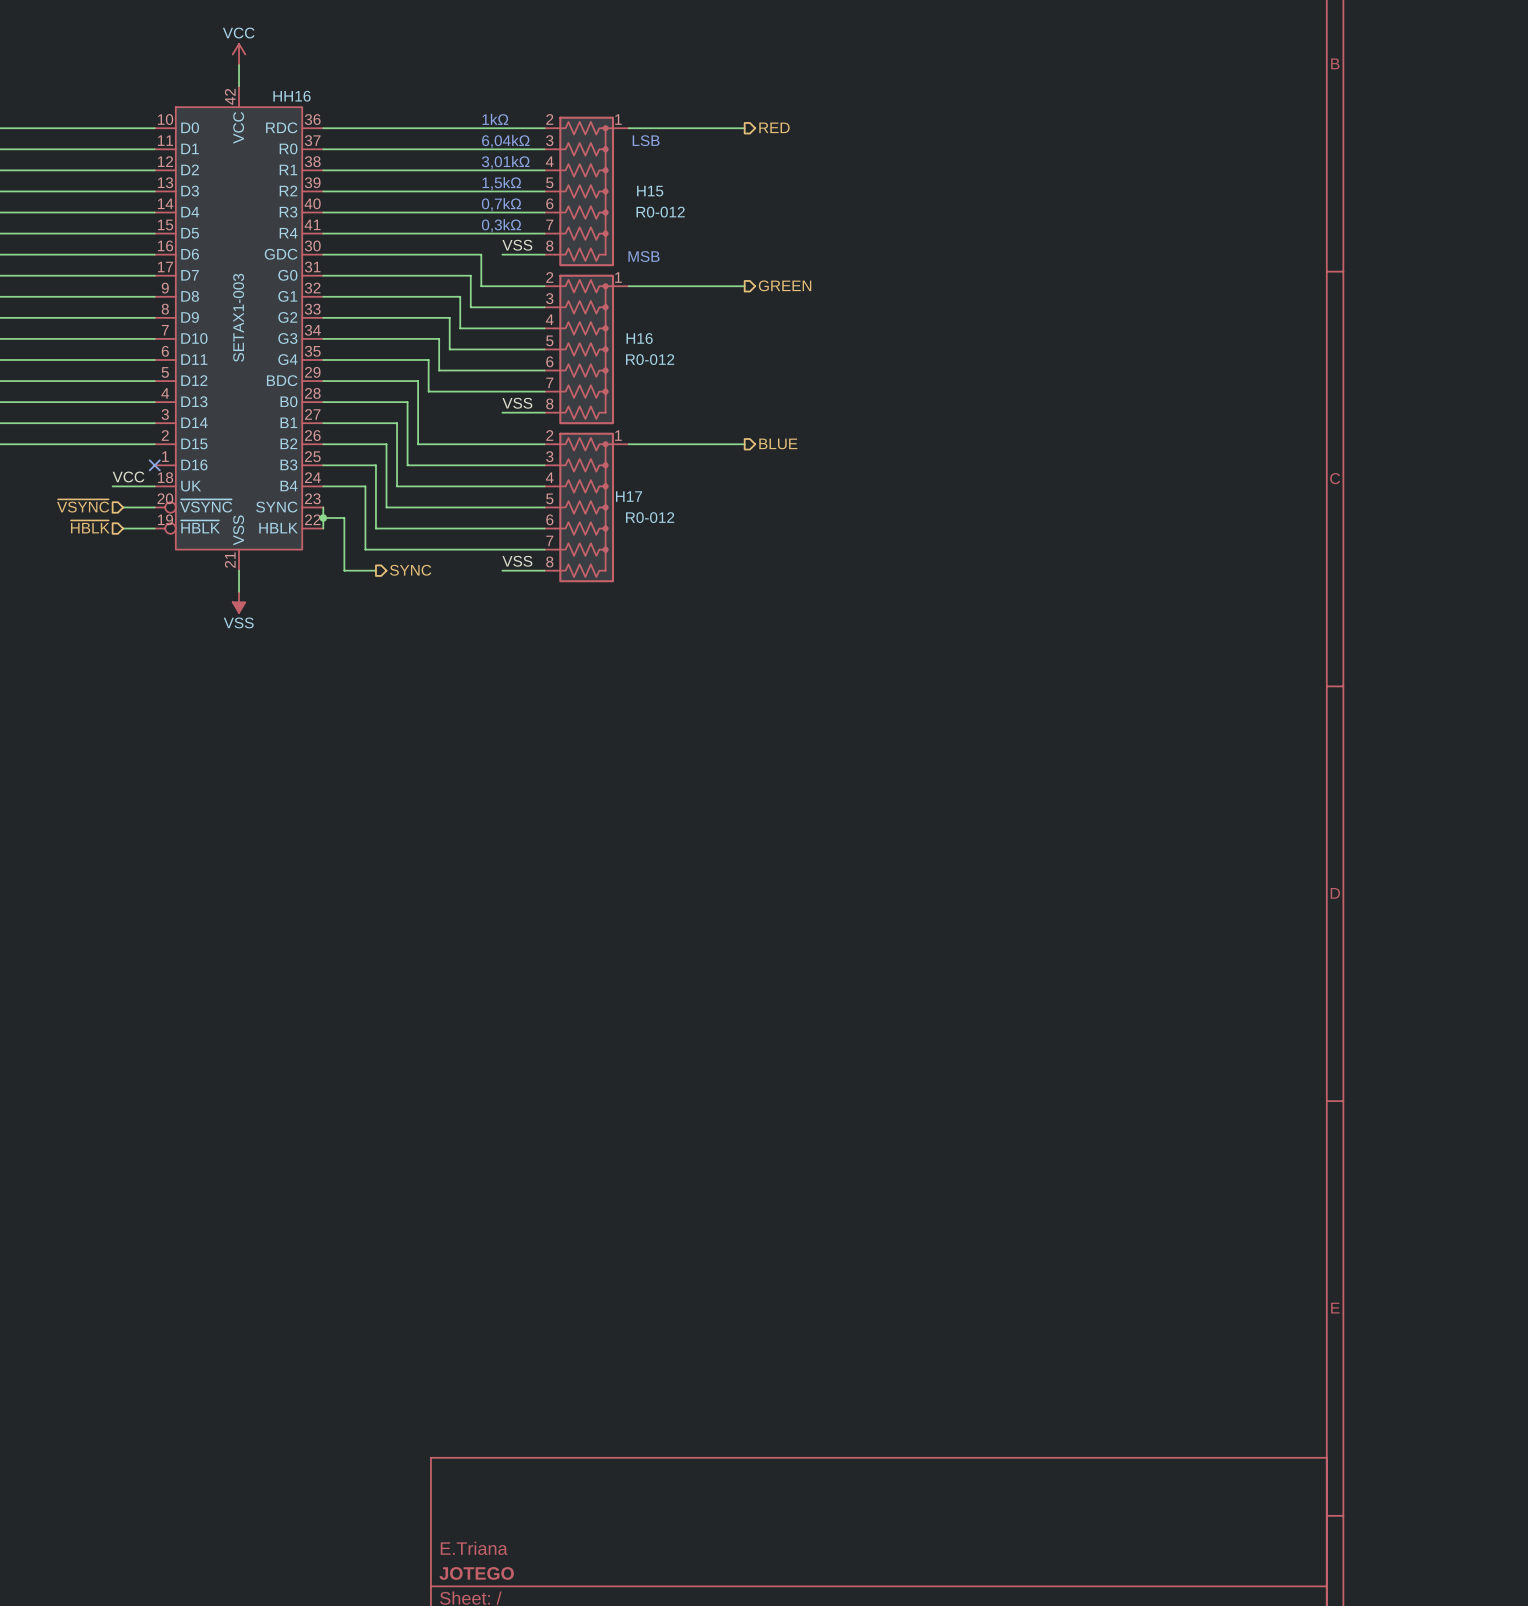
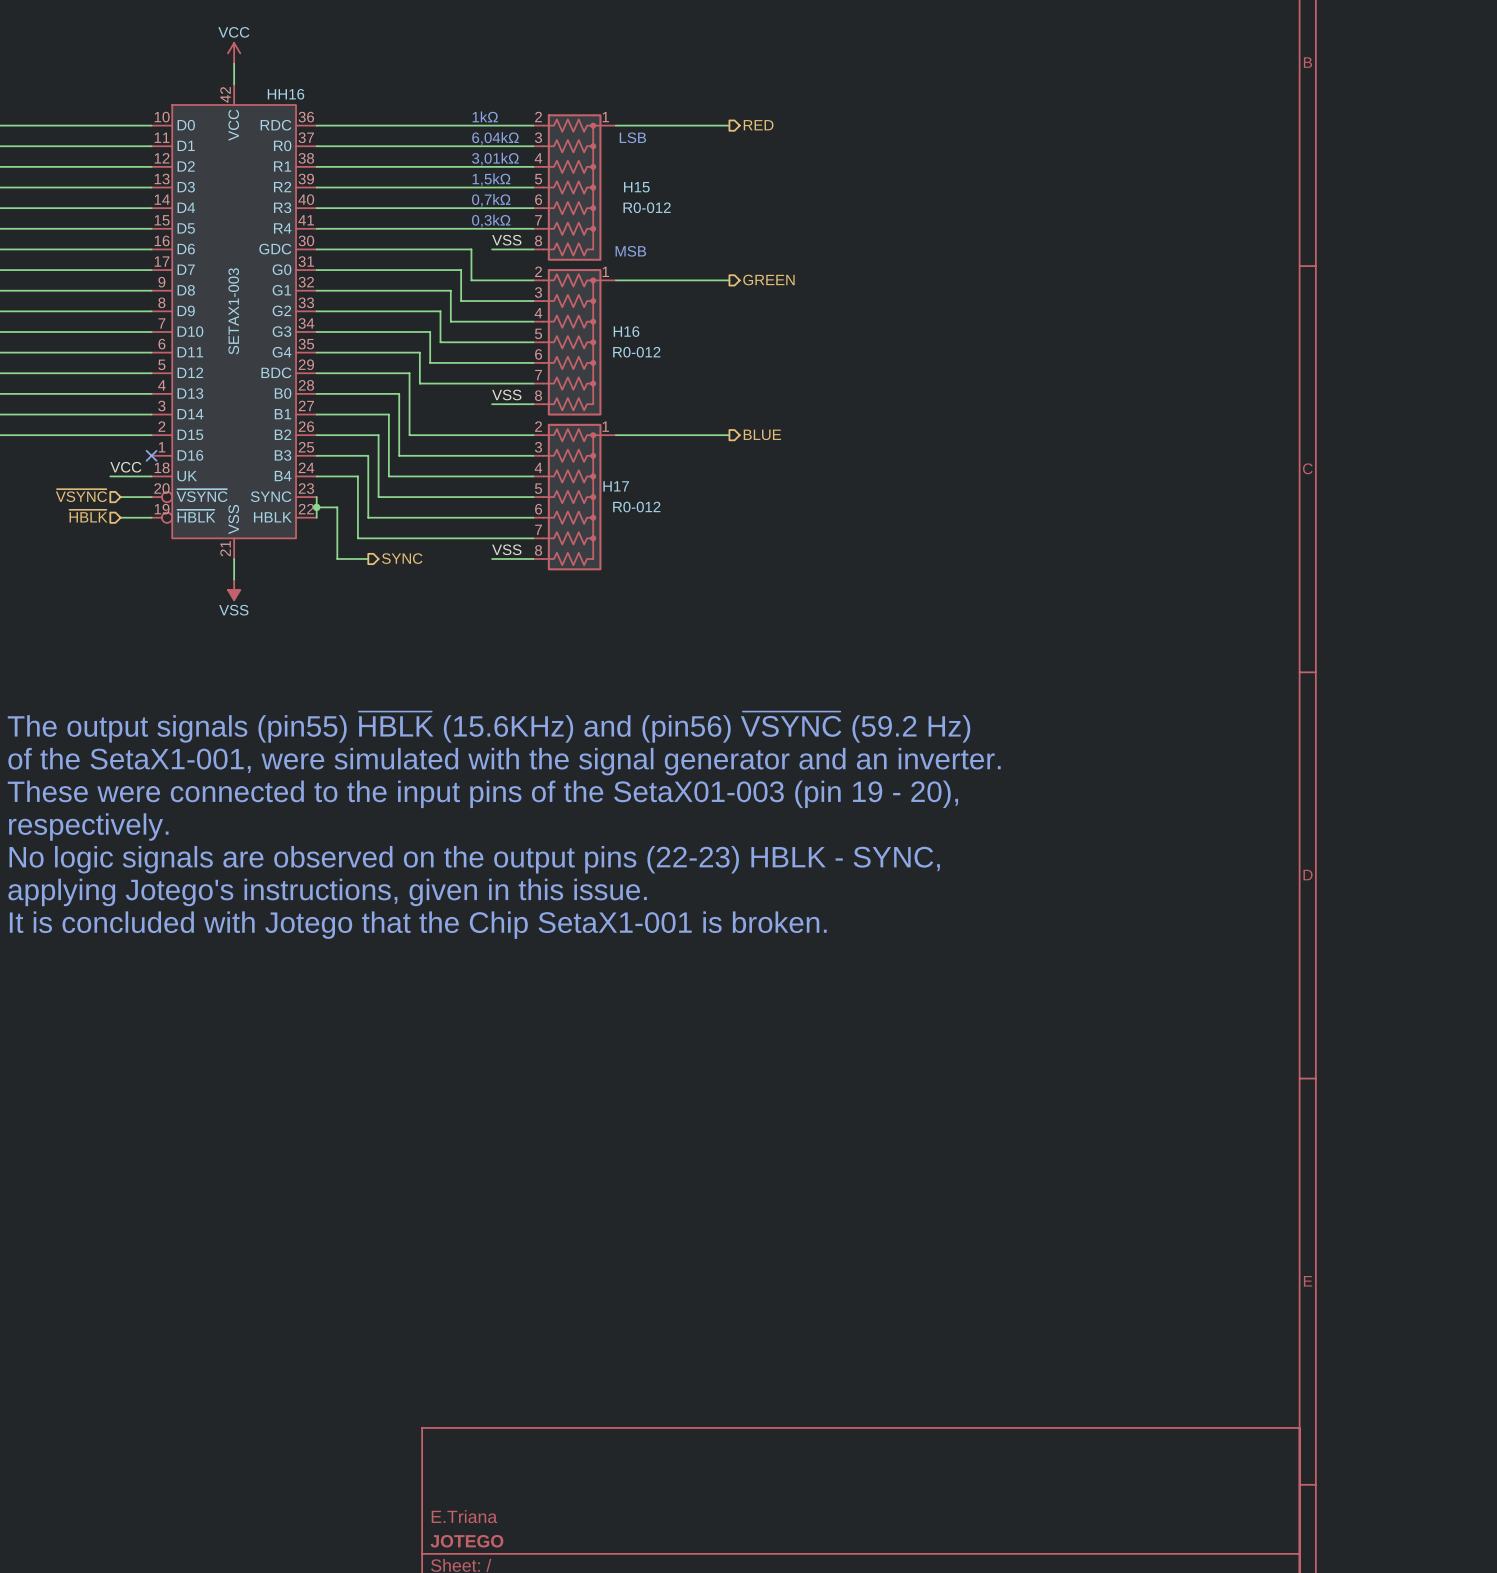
text: none -> The output signals (pin55) ~{HBLK} (15.6KHz) and (pin56) ~{VSYNC} (59.2 Hz) (489, 727)
text: none -> of the SetaX1-001, were simulated with the signal generator and an inverter. (504, 761)
text: none -> These were connected to the input pins of the SetaX01-003 (pin 19 - 20), (482, 794)
text: none -> respectively. (88, 827)
text: none -> No logic signals are observed on the output pins (22-23) HBLK - SYNC, (474, 859)
text: none -> applying Jotego's instructions, given in this issue. (327, 892)
text: none -> It is concluded with Jotego that the Chip SetaX1-001 is broken. (418, 925)

